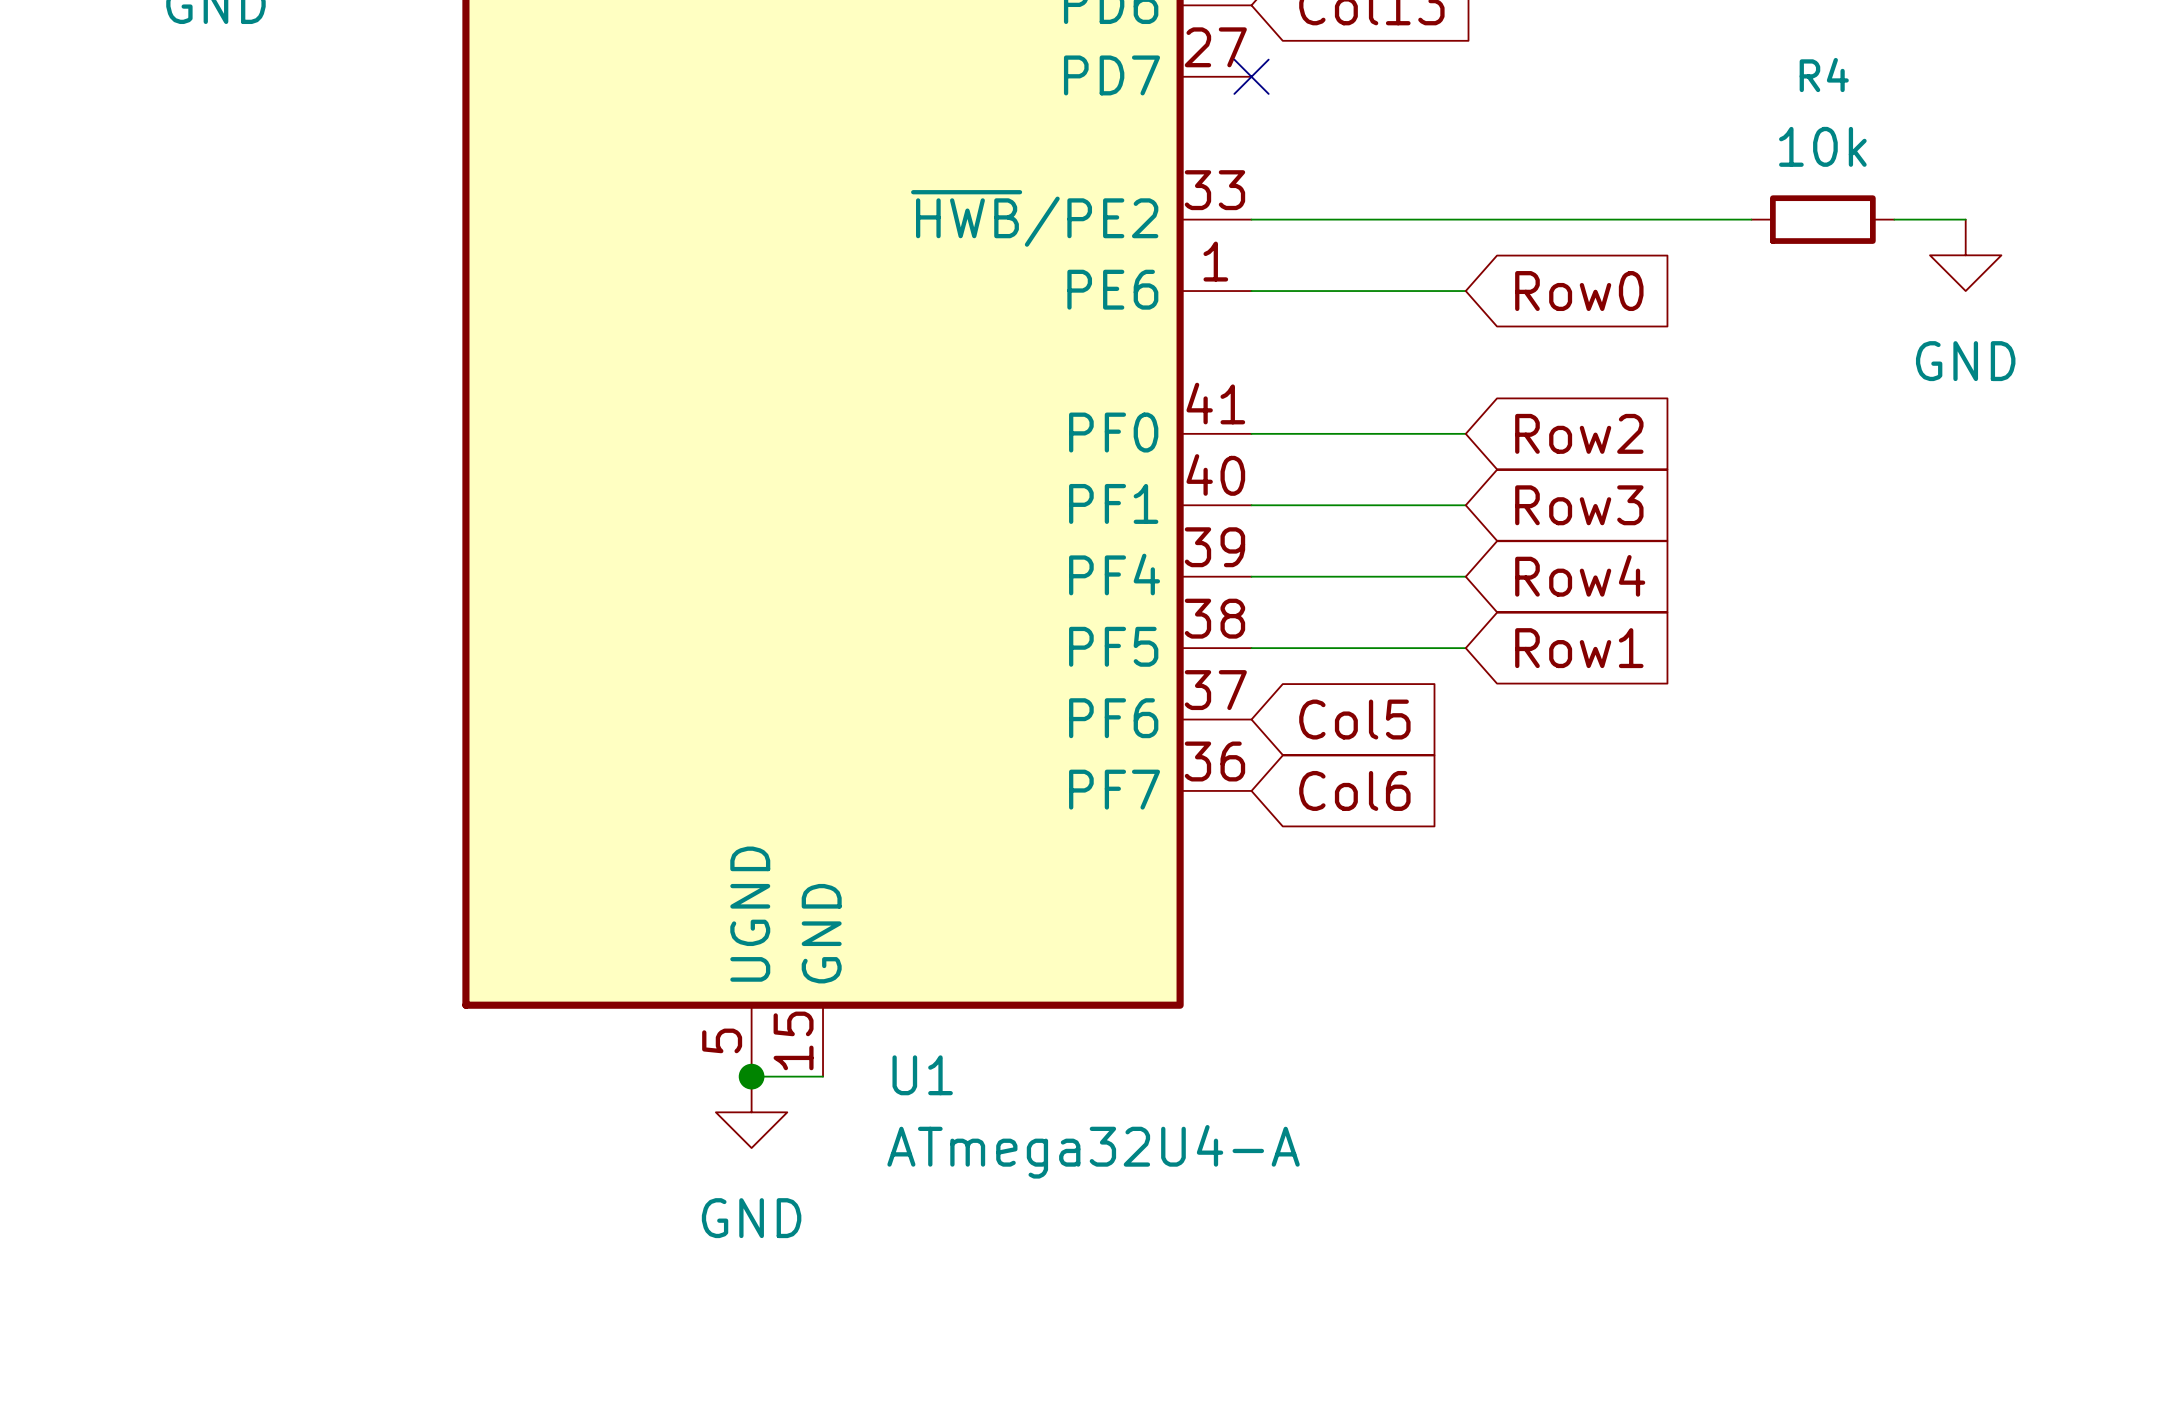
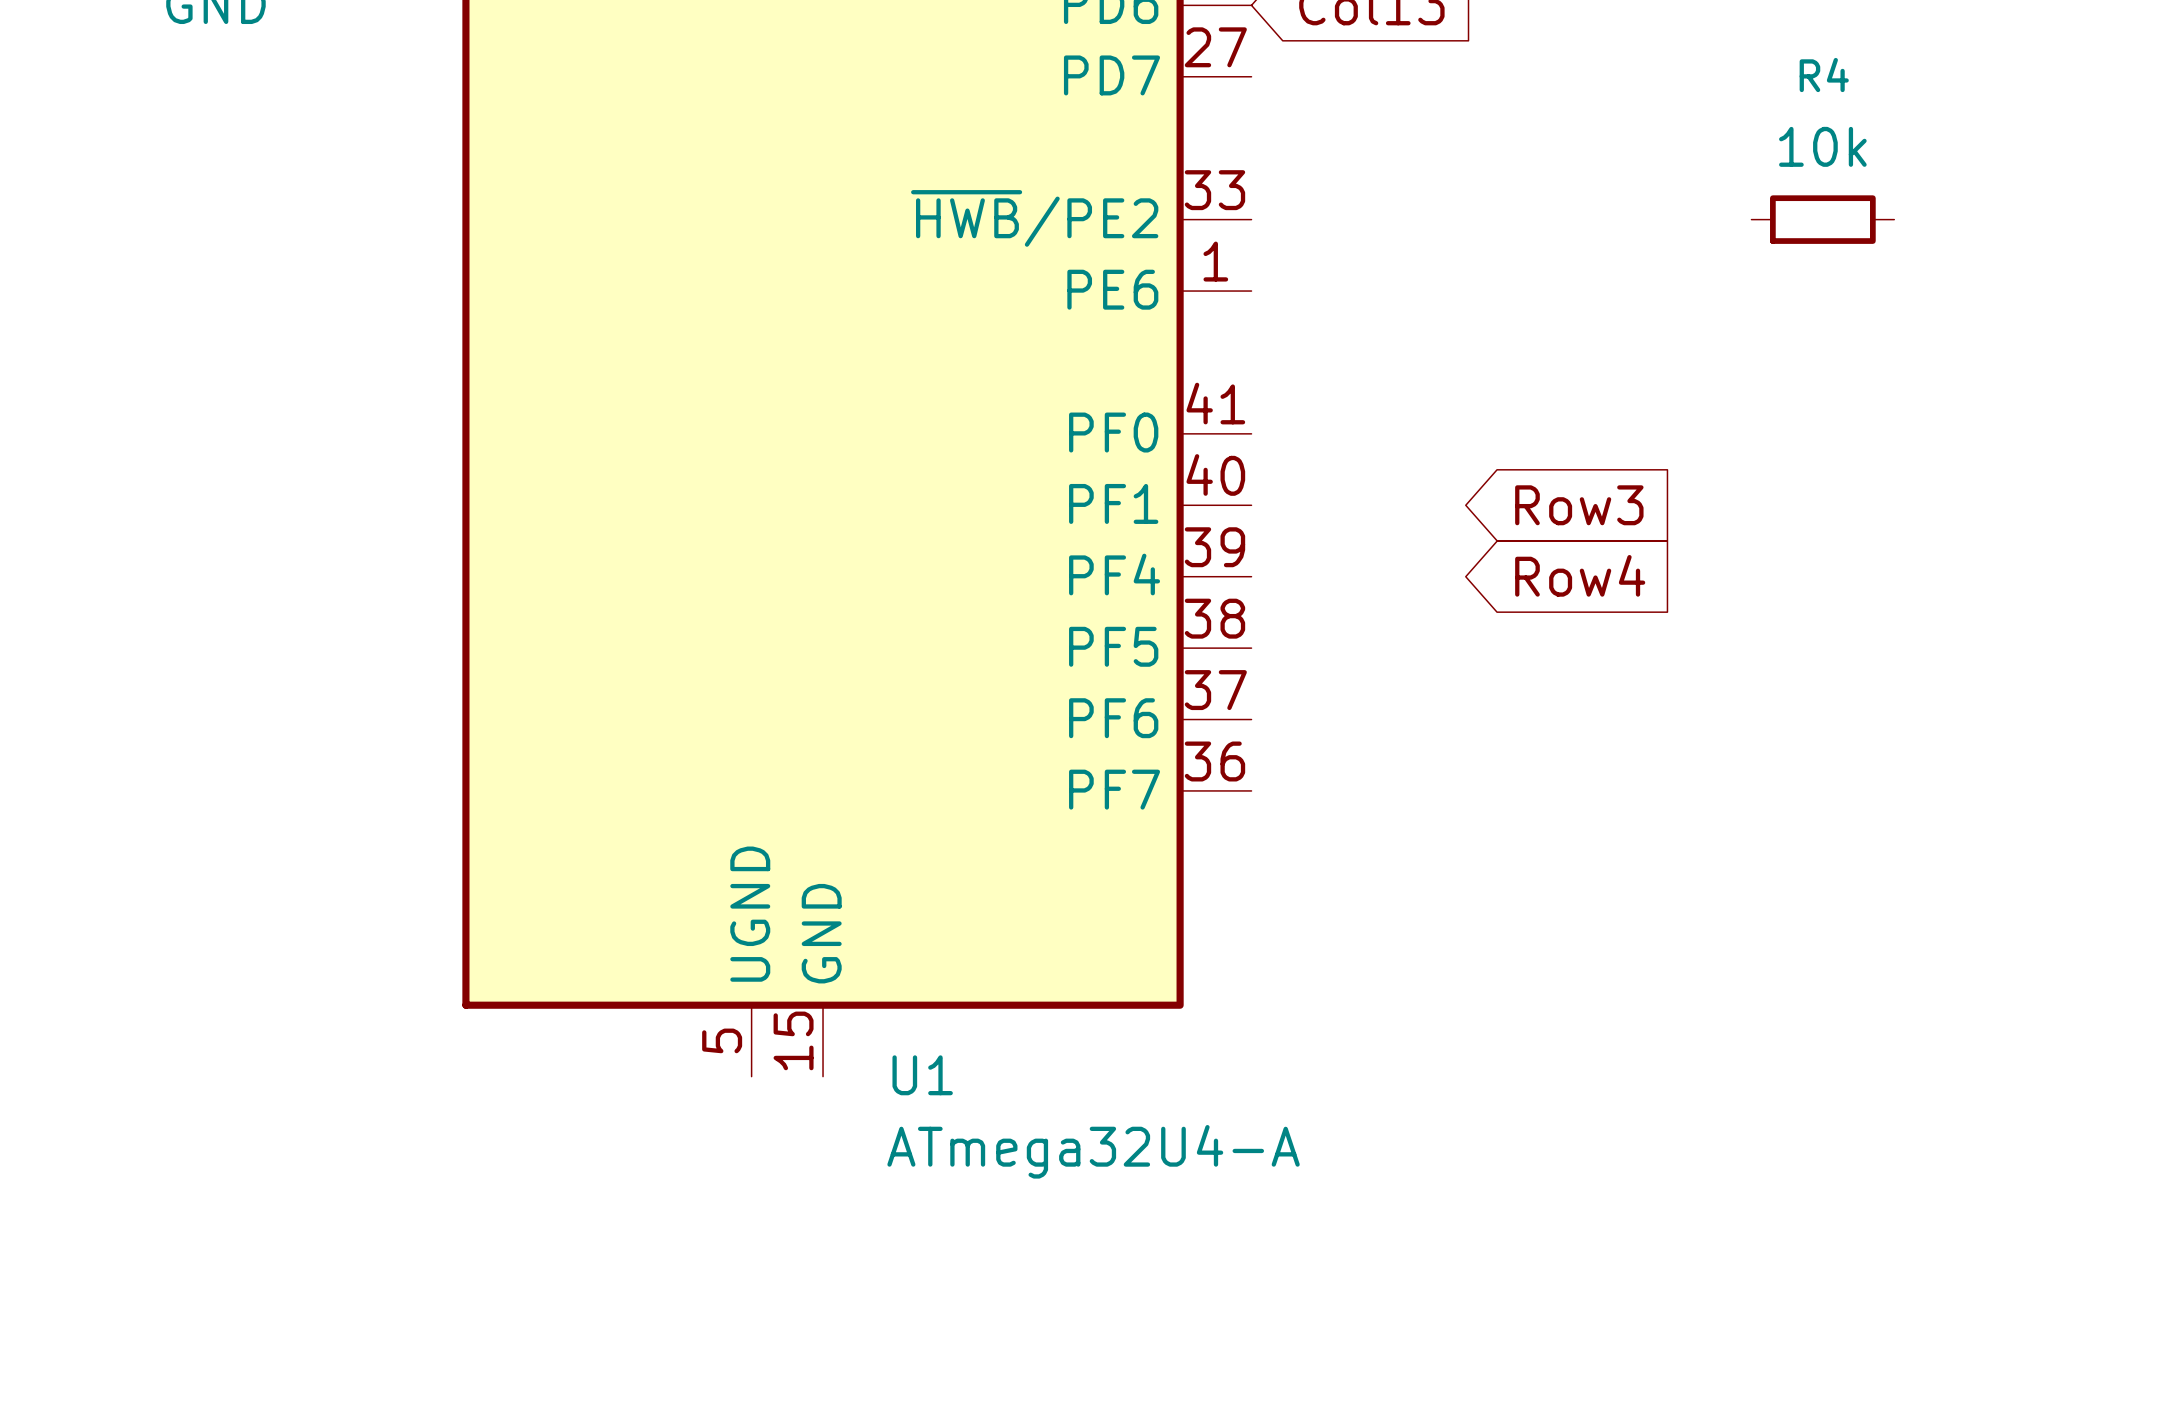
no-connect mark: (1251, 76) -> none
wire: (1251, 219) (1751, 219) -> none
wire: (1894, 219) (1965, 219) -> none
power symbol: GND (1965, 255) -> none
wire: (1251, 291) (1465, 291) -> none
global label: Row0 (1579, 291) -> none
wire: (1251, 433) (1465, 433) -> none
global label: Row2 (1579, 433) -> none
wire: (1251, 505) (1465, 505) -> none
wire: (1251, 576) (1465, 576) -> none
wire: (1251, 648) (1465, 648) -> none
global label: Row1 (1579, 648) -> none
global label: Col5 (1354, 719) -> none
global label: Col6 (1354, 790) -> none
wire: (751, 1076) (823, 1076) -> none
junction: (751, 1076) -> none
power symbol: GND (751, 1112) -> none

